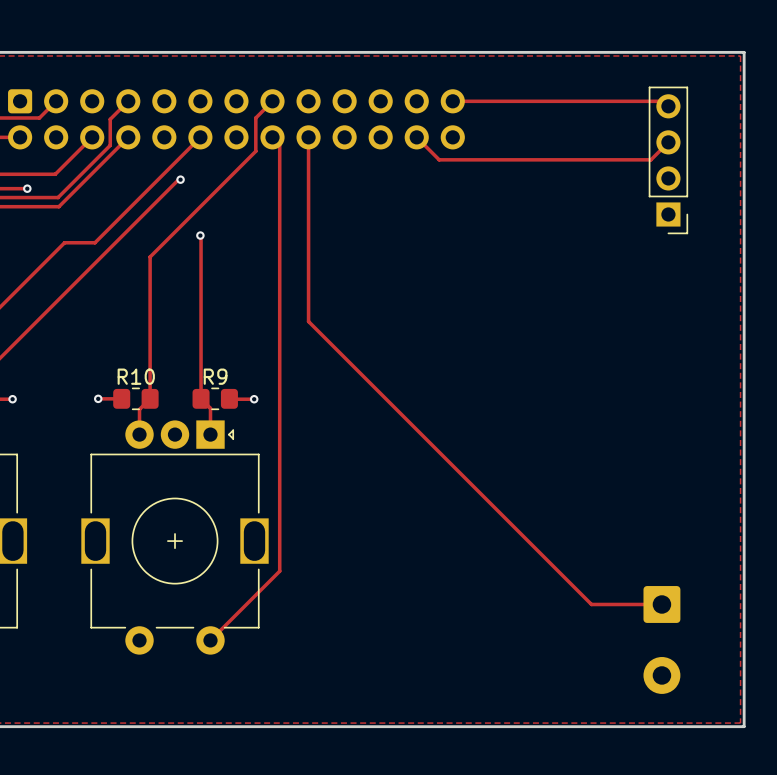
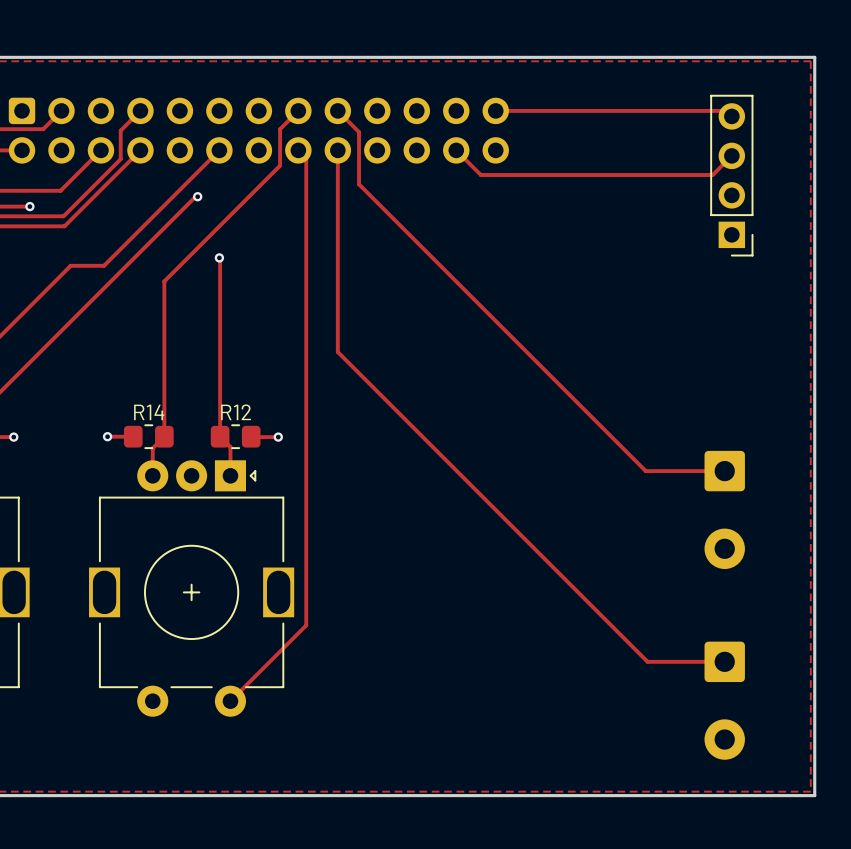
track: none -> (337, 110) (359, 132) (359, 184) (645, 471) (724, 471)
R10 name: R10 (136, 376) -> R14 (149, 412)
R9 name: R9 (215, 376) -> R12 (236, 412)
part: none -> (724, 509)

